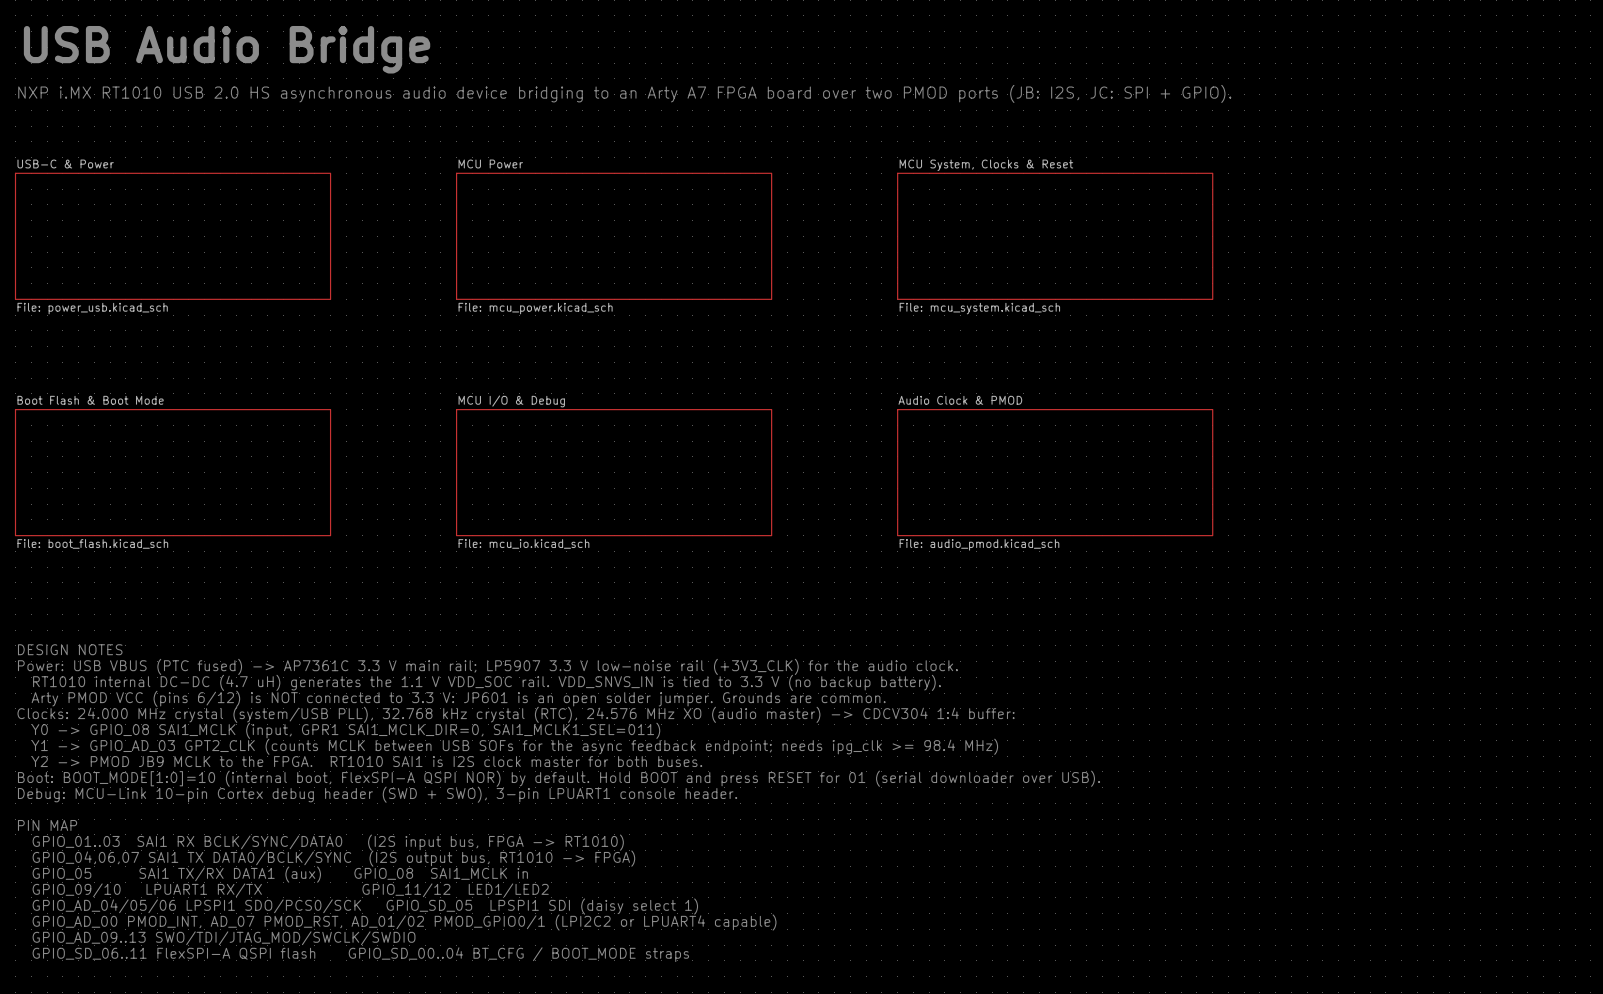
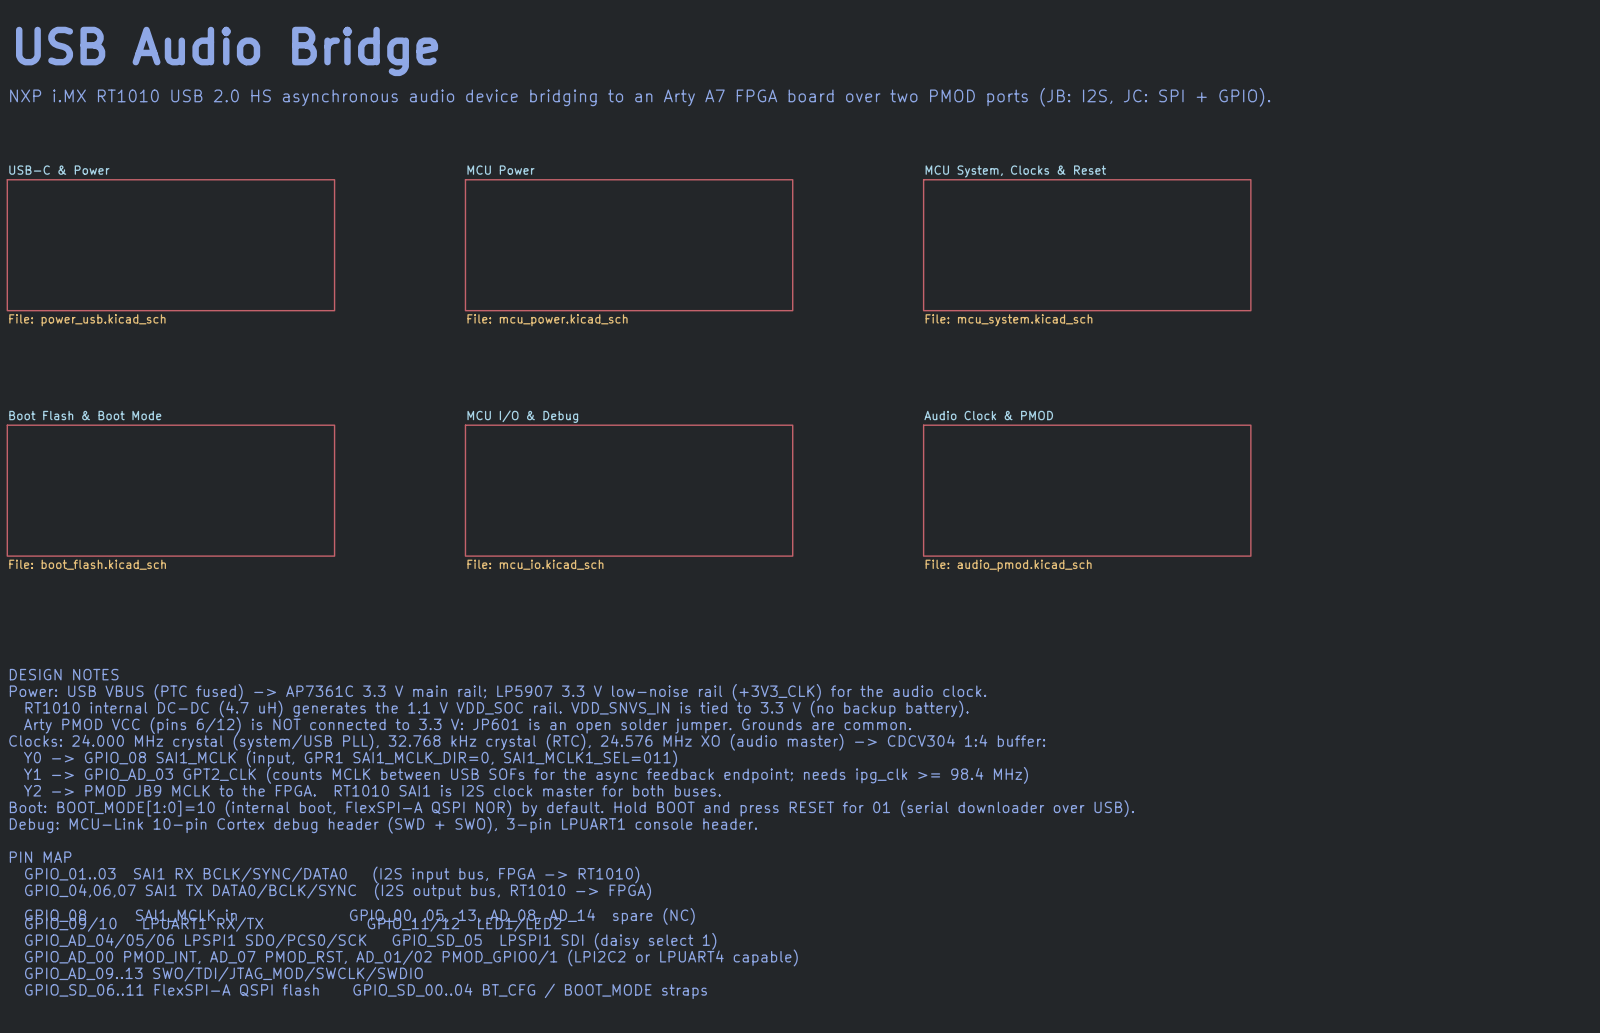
text: GPIO_05 SAI1 TX/RX DATA1 (aux) GPIO_08 SAI1_MCLK in (280, 874) -> none
text: none -> GPIO_08 SAI1_MCLK in GPIO_00, 05, 13, AD_08, AD_14 spare (NC) (359, 916)

